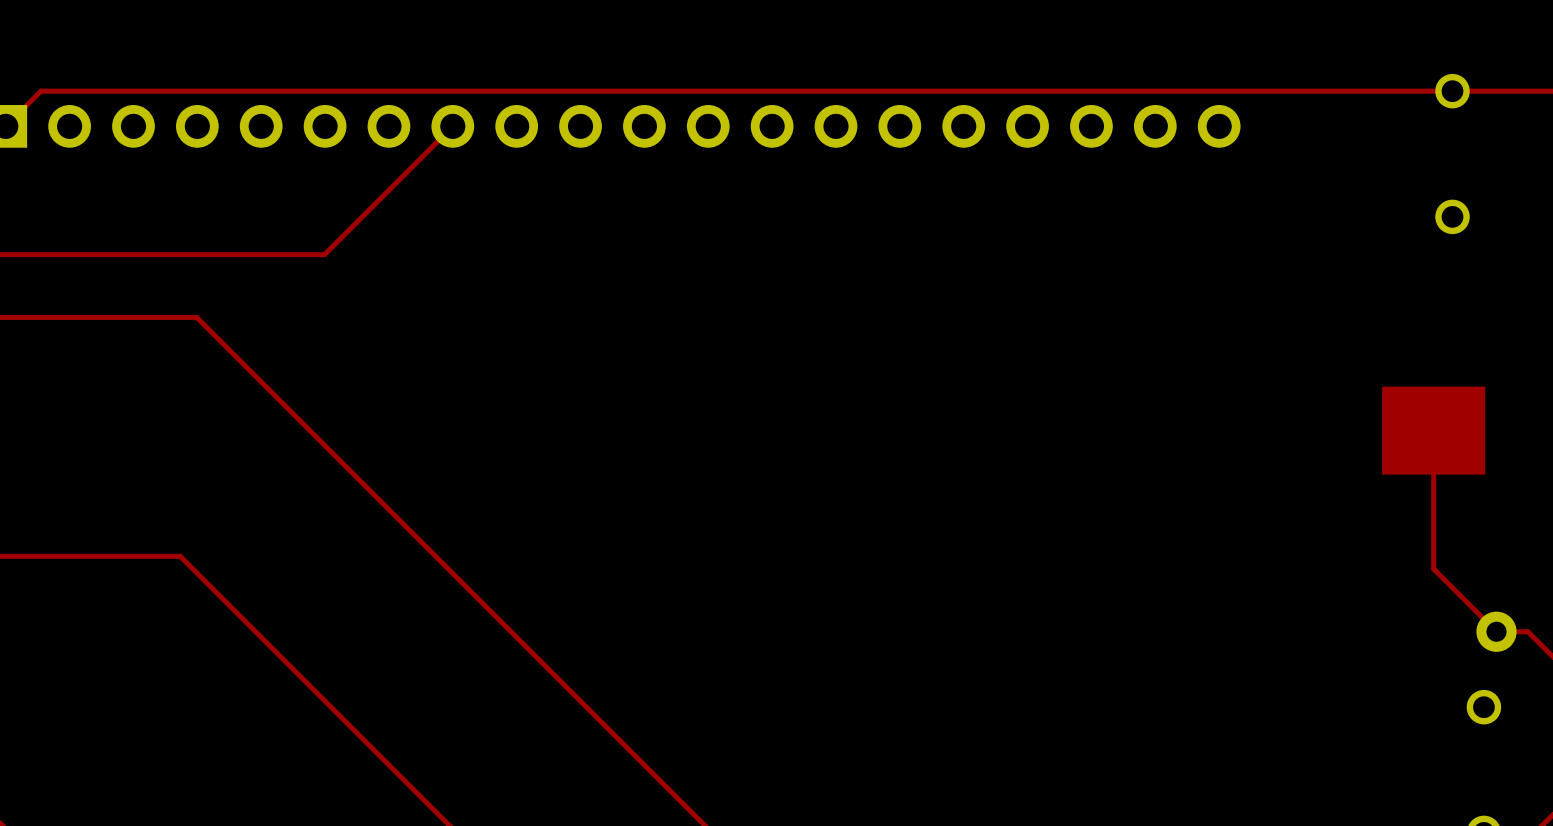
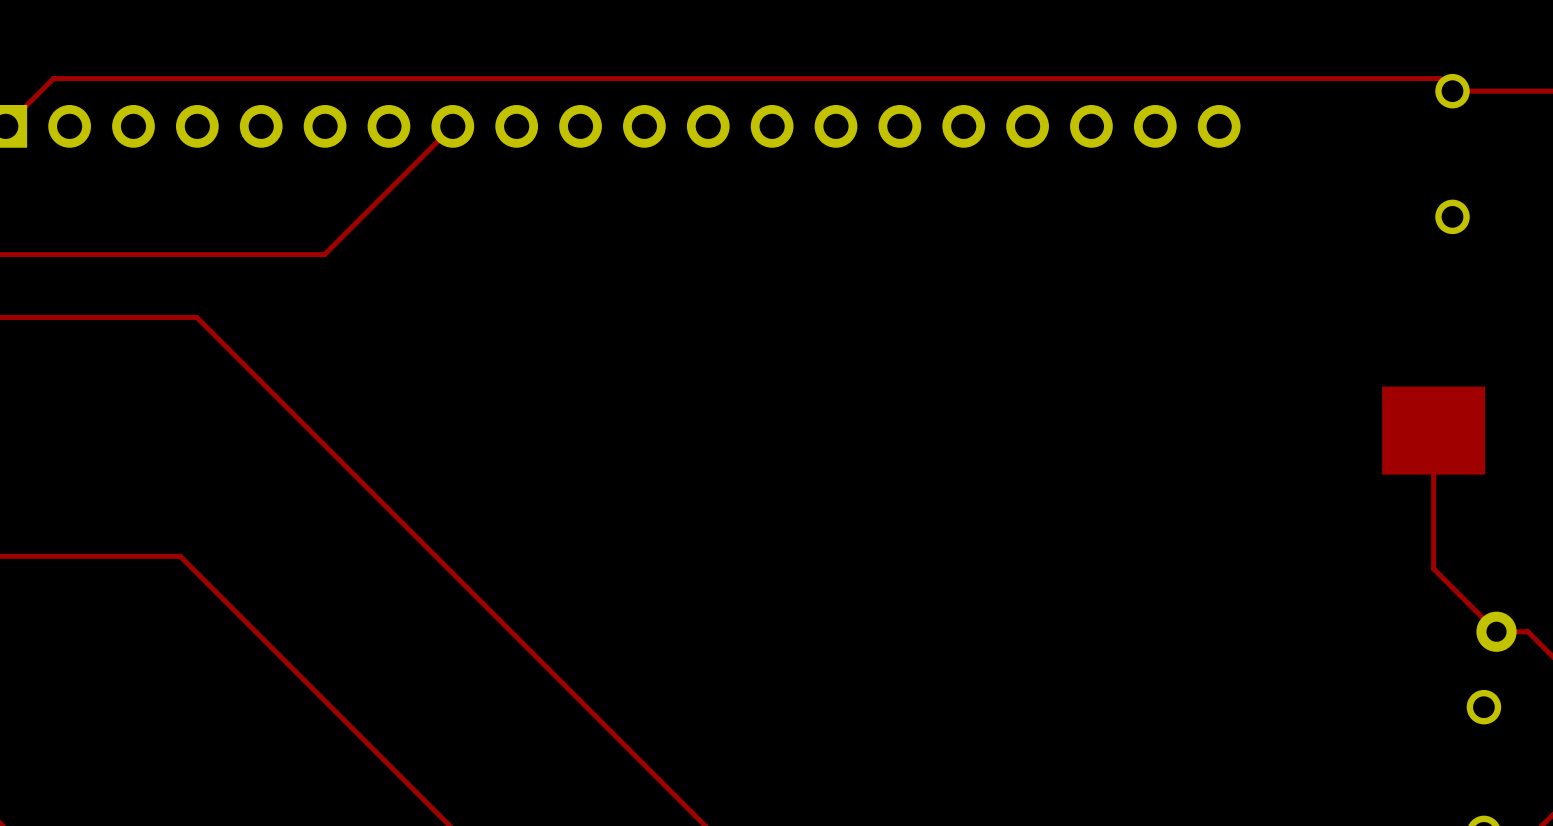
top track: (1452, 91) (40, 91) -> (1452, 91) (1439, 78) (53, 78) (40, 91)

